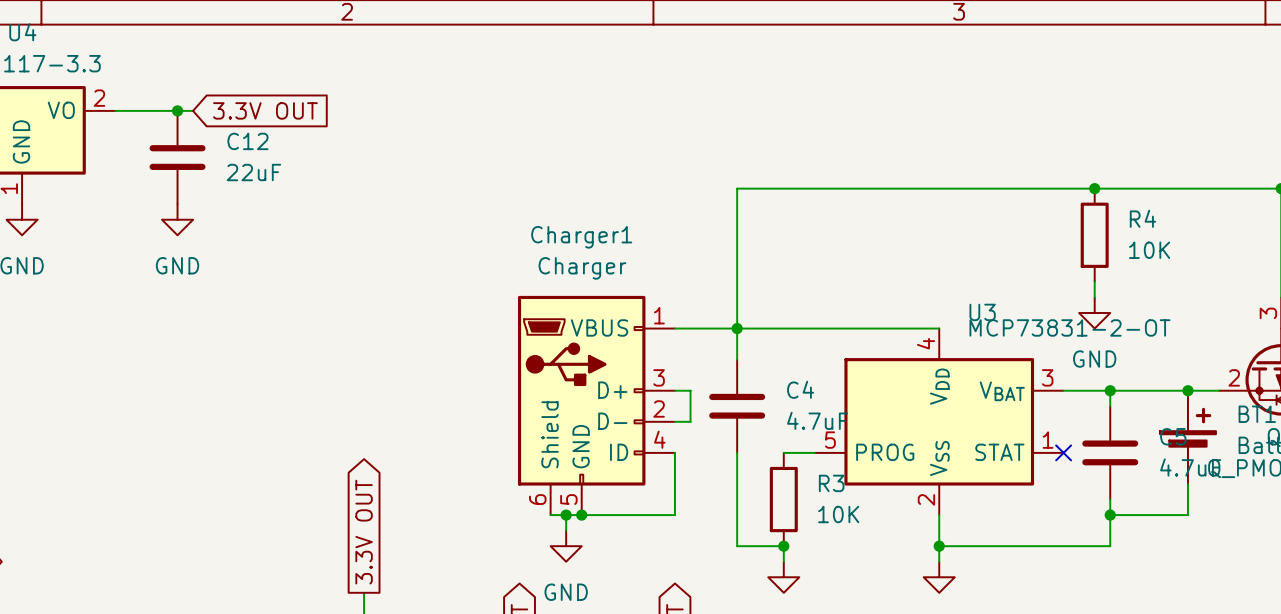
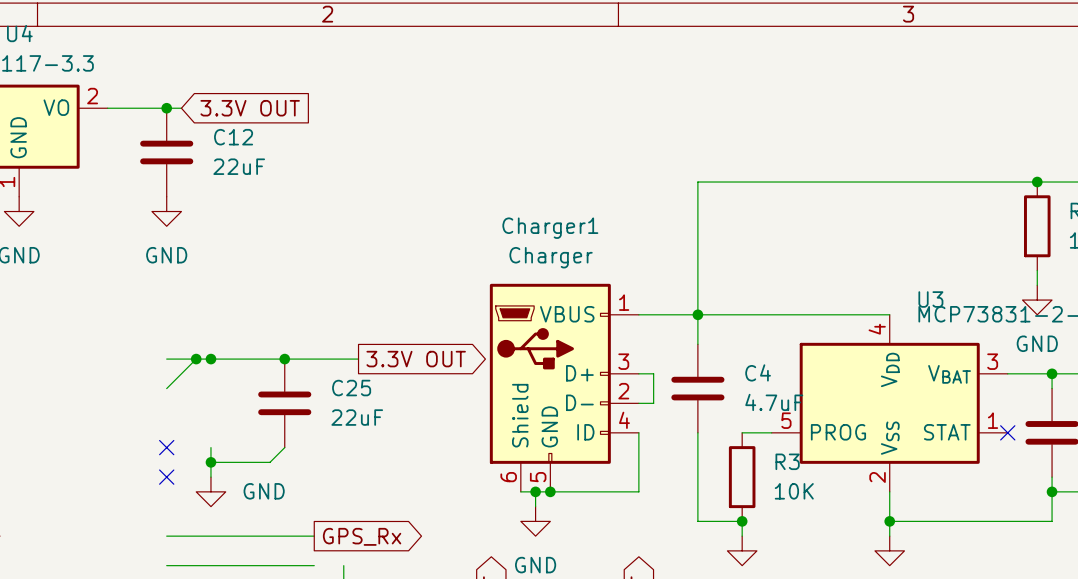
wire: none -> (166, 359) (358, 359)
wire: none -> (196, 359) (166, 388)
junction: none -> (196, 359)
junction: none -> (210, 359)
junction: none -> (284, 359)
C25: none -> 22uF (284, 403)
no-connect mark: none -> (166, 447)
wire: none -> (210, 447) (210, 477)
wire: none -> (284, 447) (270, 462) (210, 462)
junction: none -> (210, 462)
no-connect mark: none -> (166, 477)
power symbol: none -> GND (210, 491)
global label rotation: 0° (364, 532) -> 90° clockwise (416, 359)
global label position: 3.3V OUT (364, 532) -> 3.3V OUT (416, 359)
wire: none -> (166, 536) (314, 536)
global label: none -> GPS_Rx (362, 536)
wire: none -> (166, 565) (314, 565)

